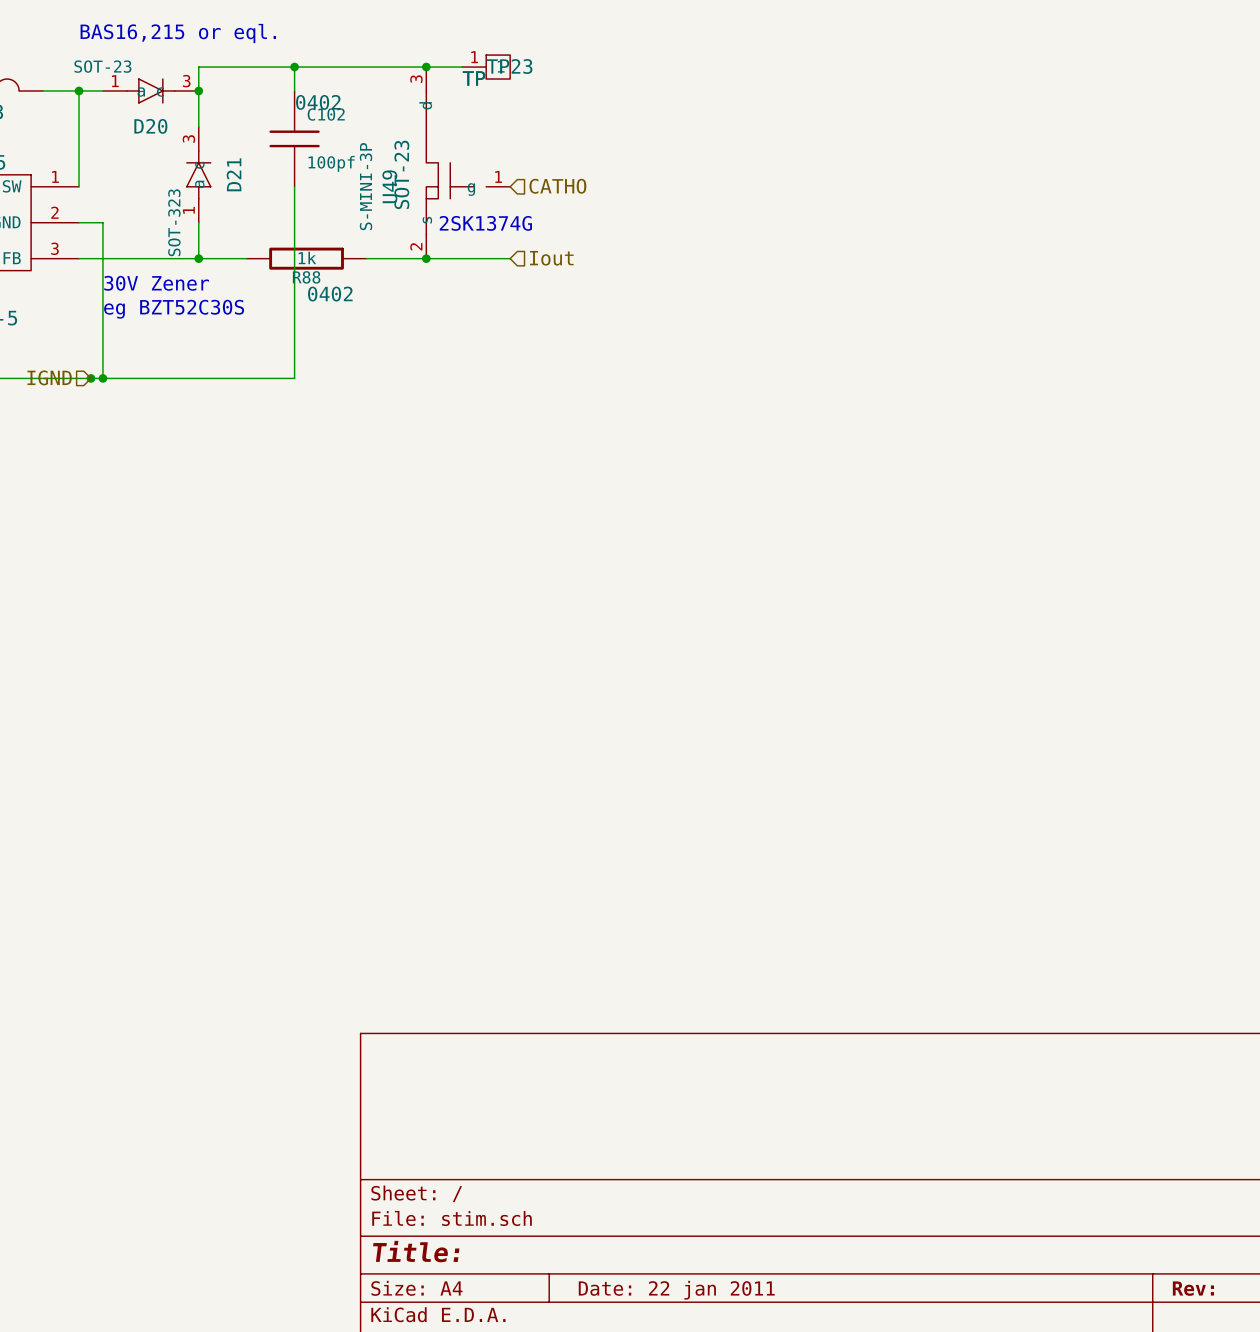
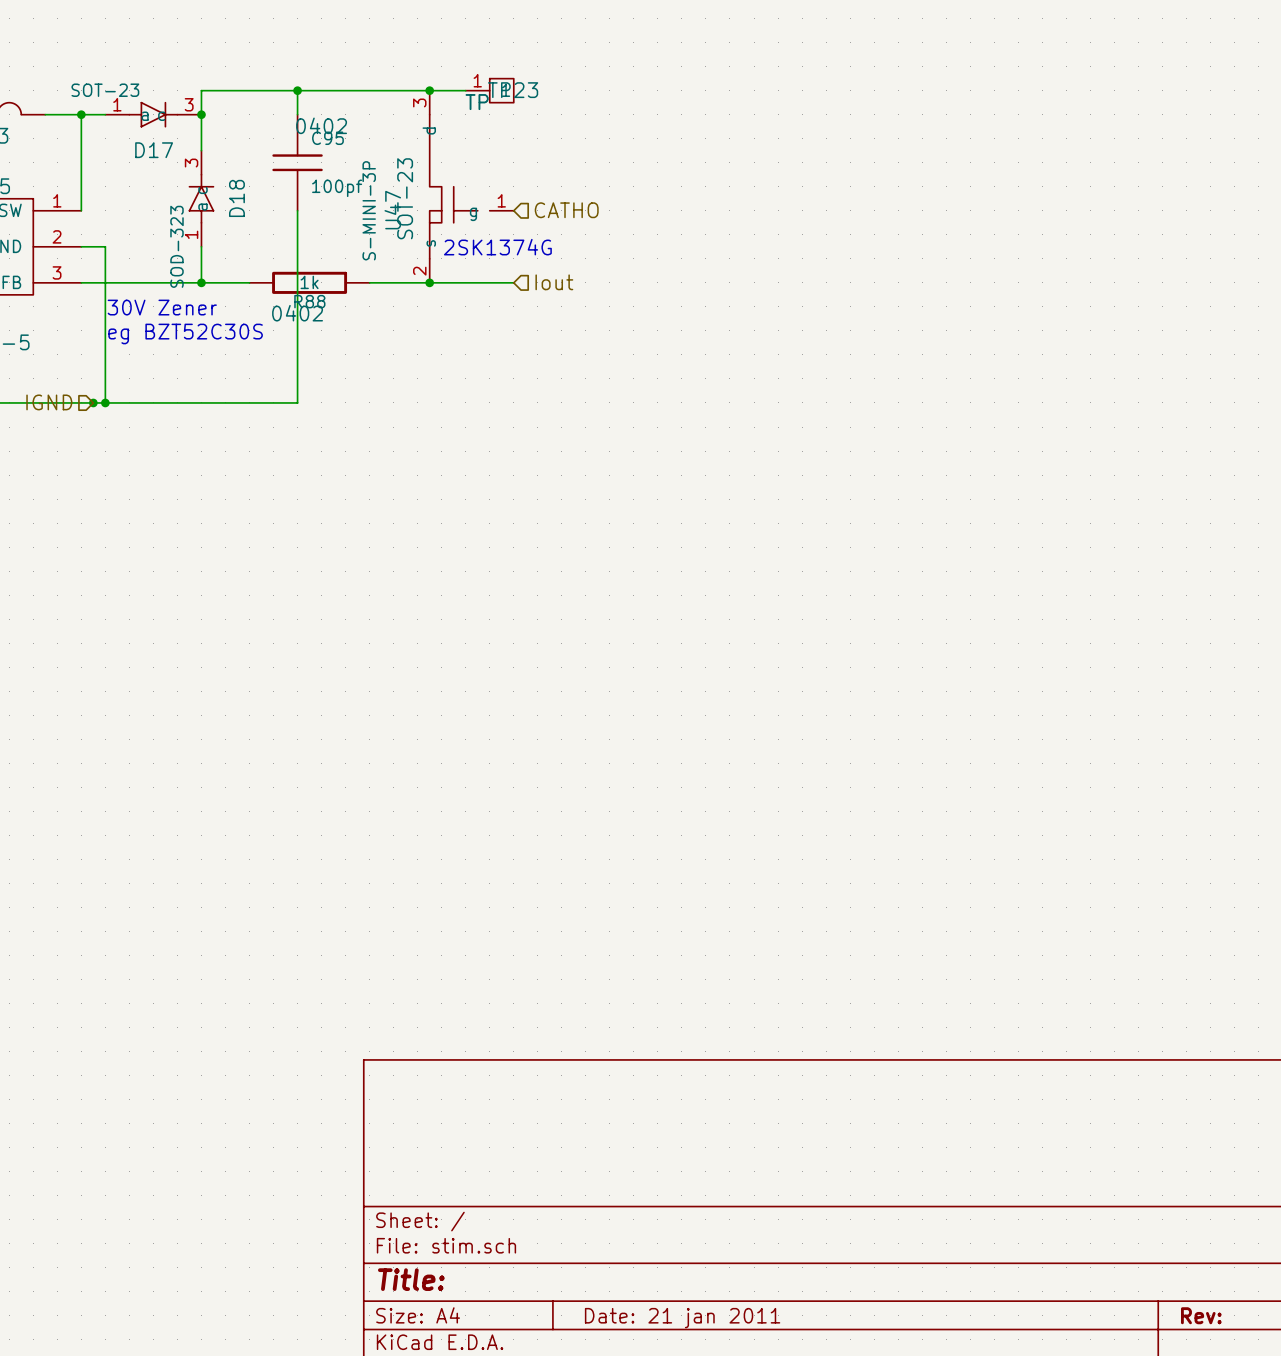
text: BAS16,215 or eql. (178, 33) -> none
C102 name: C102 (326, 114) -> C95 (327, 138)
D20 name: D20 (150, 126) -> D17 (154, 150)
D21 name: D21 (234, 174) -> D18 (236, 198)
U49 name: U49 (389, 186) -> U47 (392, 210)
D21 text: SOT-323 (174, 222) -> SOD-323 (176, 246)
R88 text position: 0402 (330, 294) -> 0402 (297, 313)
title block: Date: 22 jan 2011 (676, 1290) -> Date: 21 jan 2011 (682, 1318)

